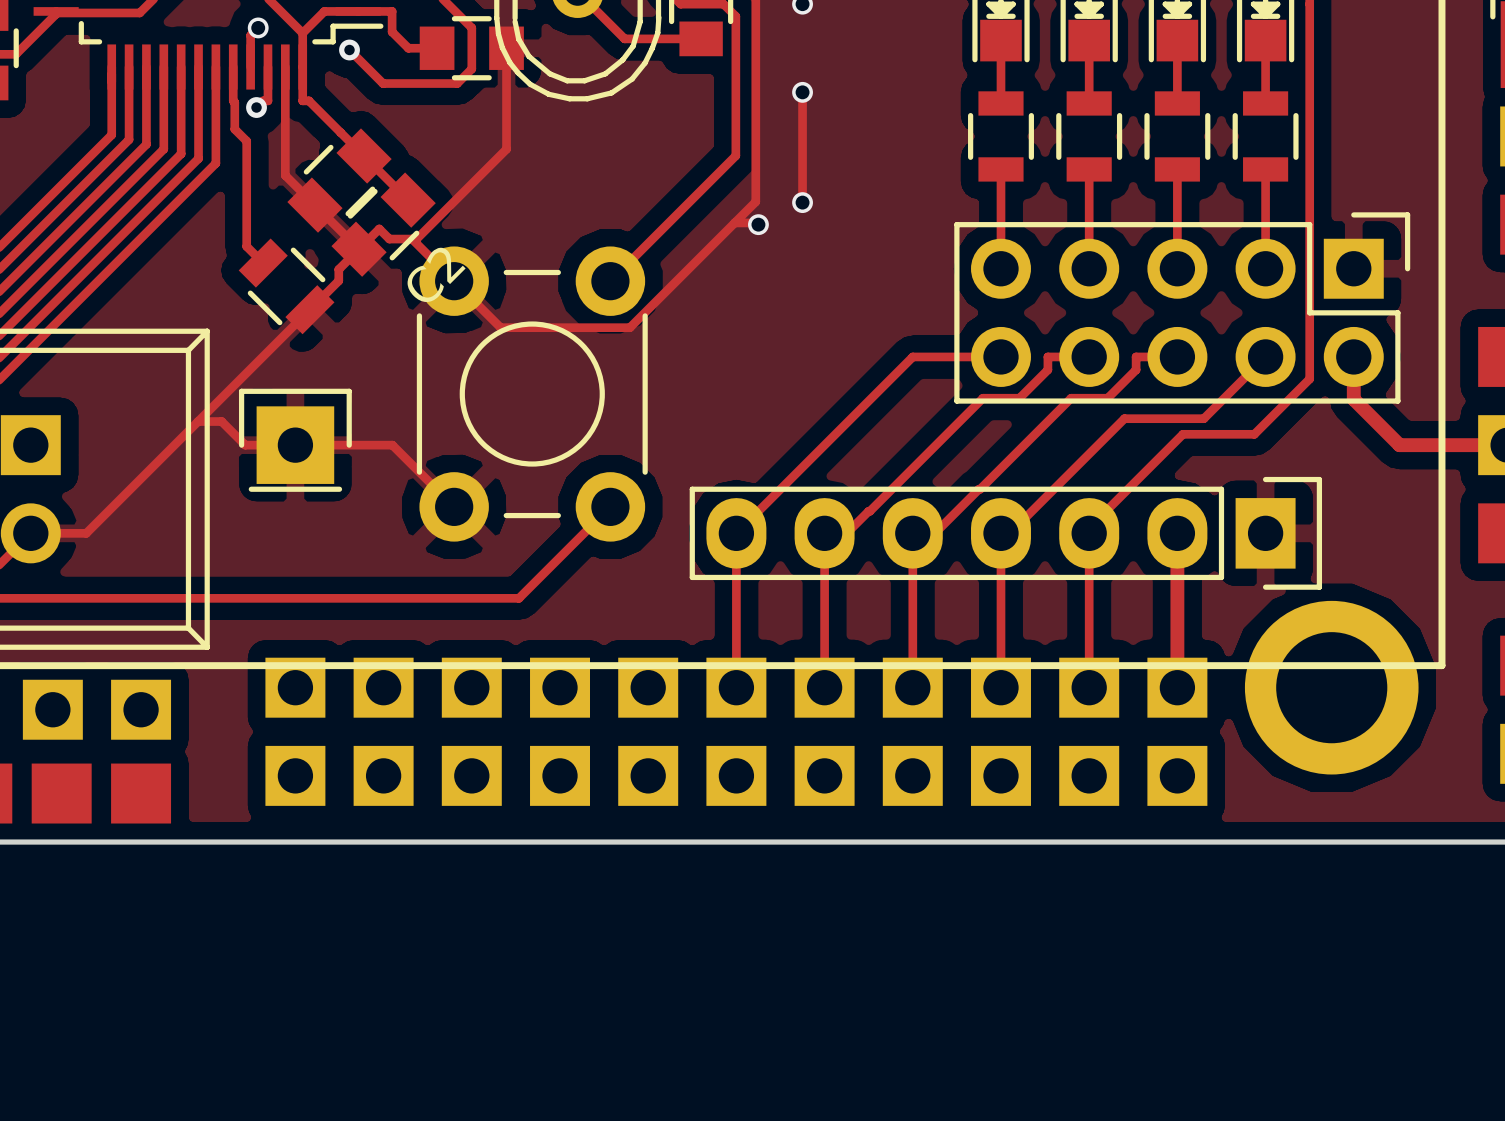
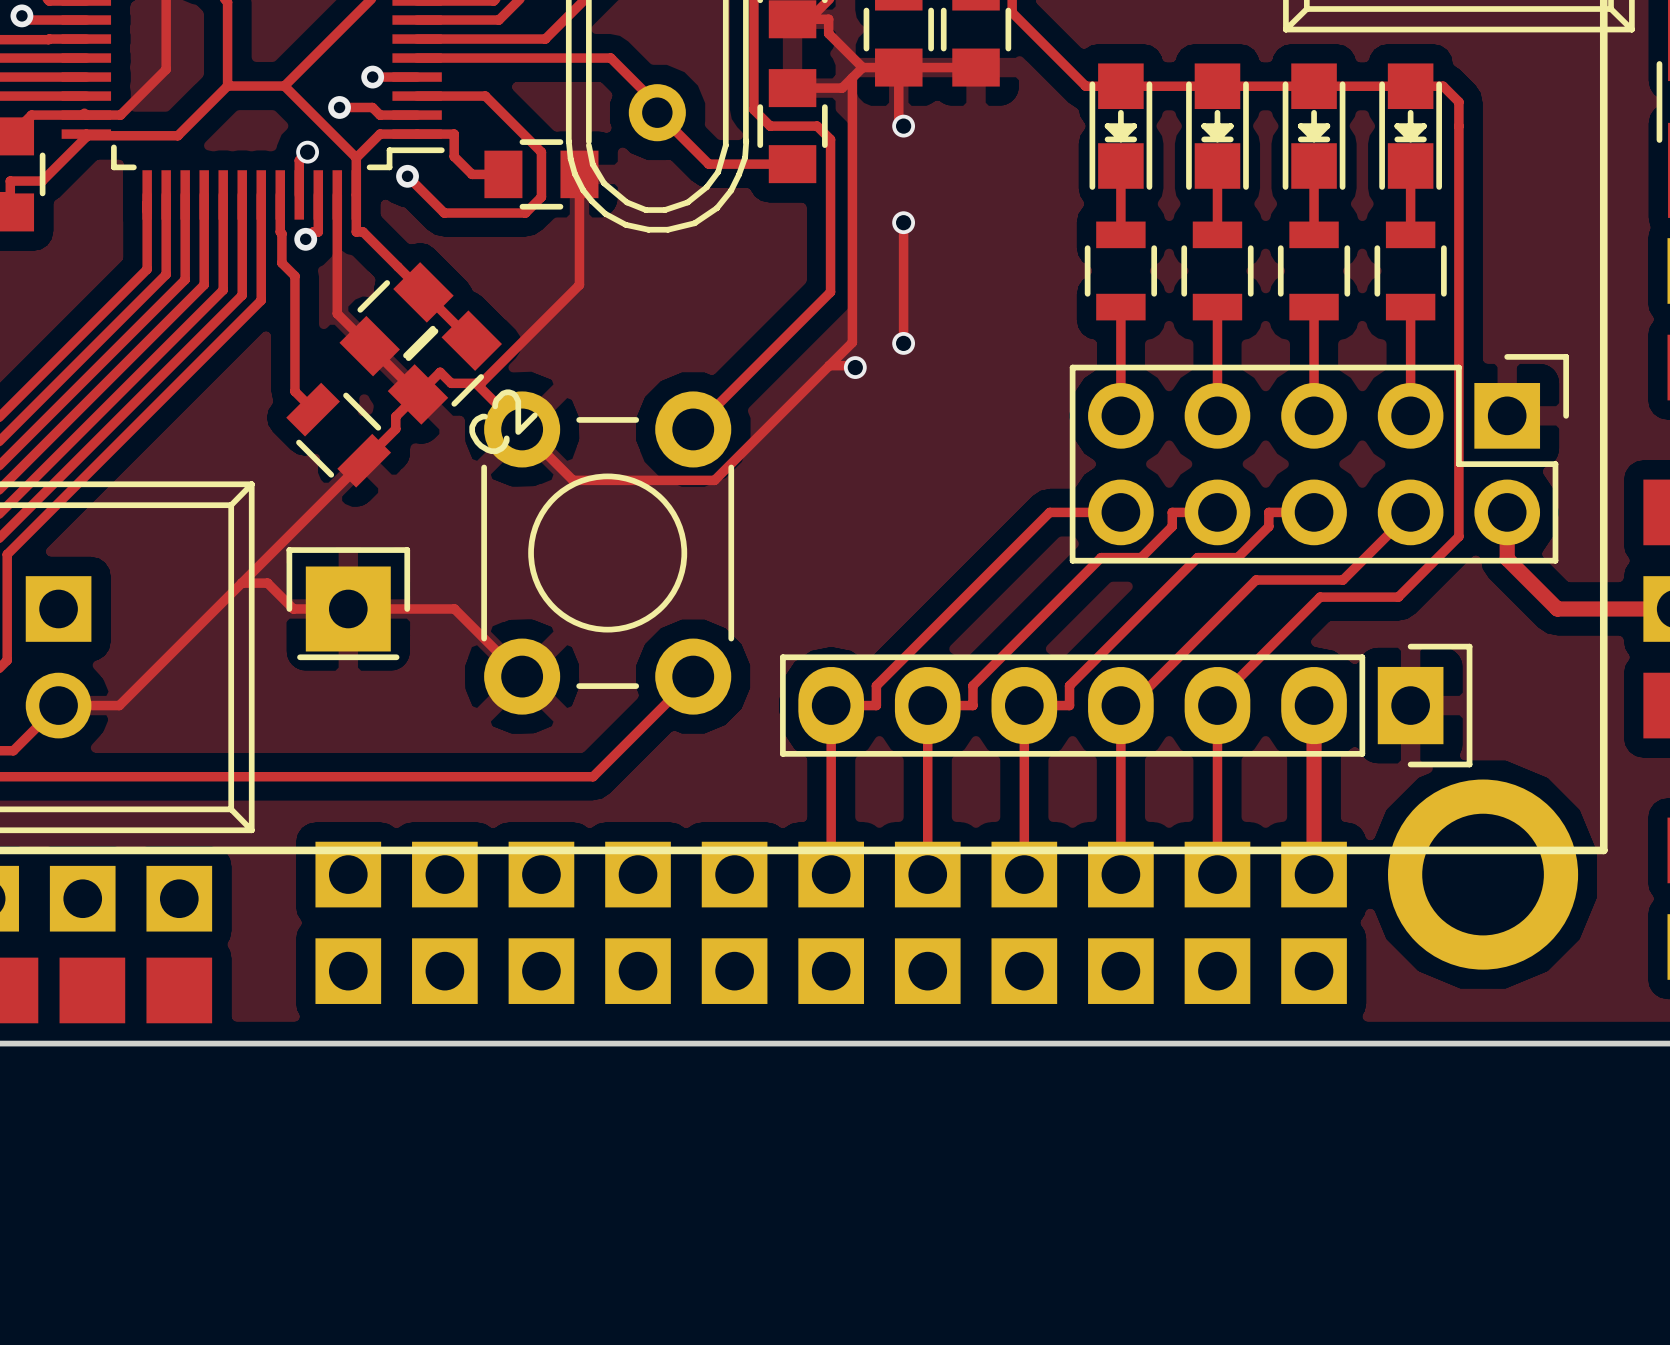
track: (936, 356) (912, 356) (736, 533) -> (1049, 512) (876, 685) (876, 705) (831, 705)
track: (980, 489) (934, 533) -> (1098, 657) (1069, 685) (1069, 705) (1048, 705)
track: (869, 511) (846, 533) -> (977, 681) (972, 685) (972, 705) (951, 705)

